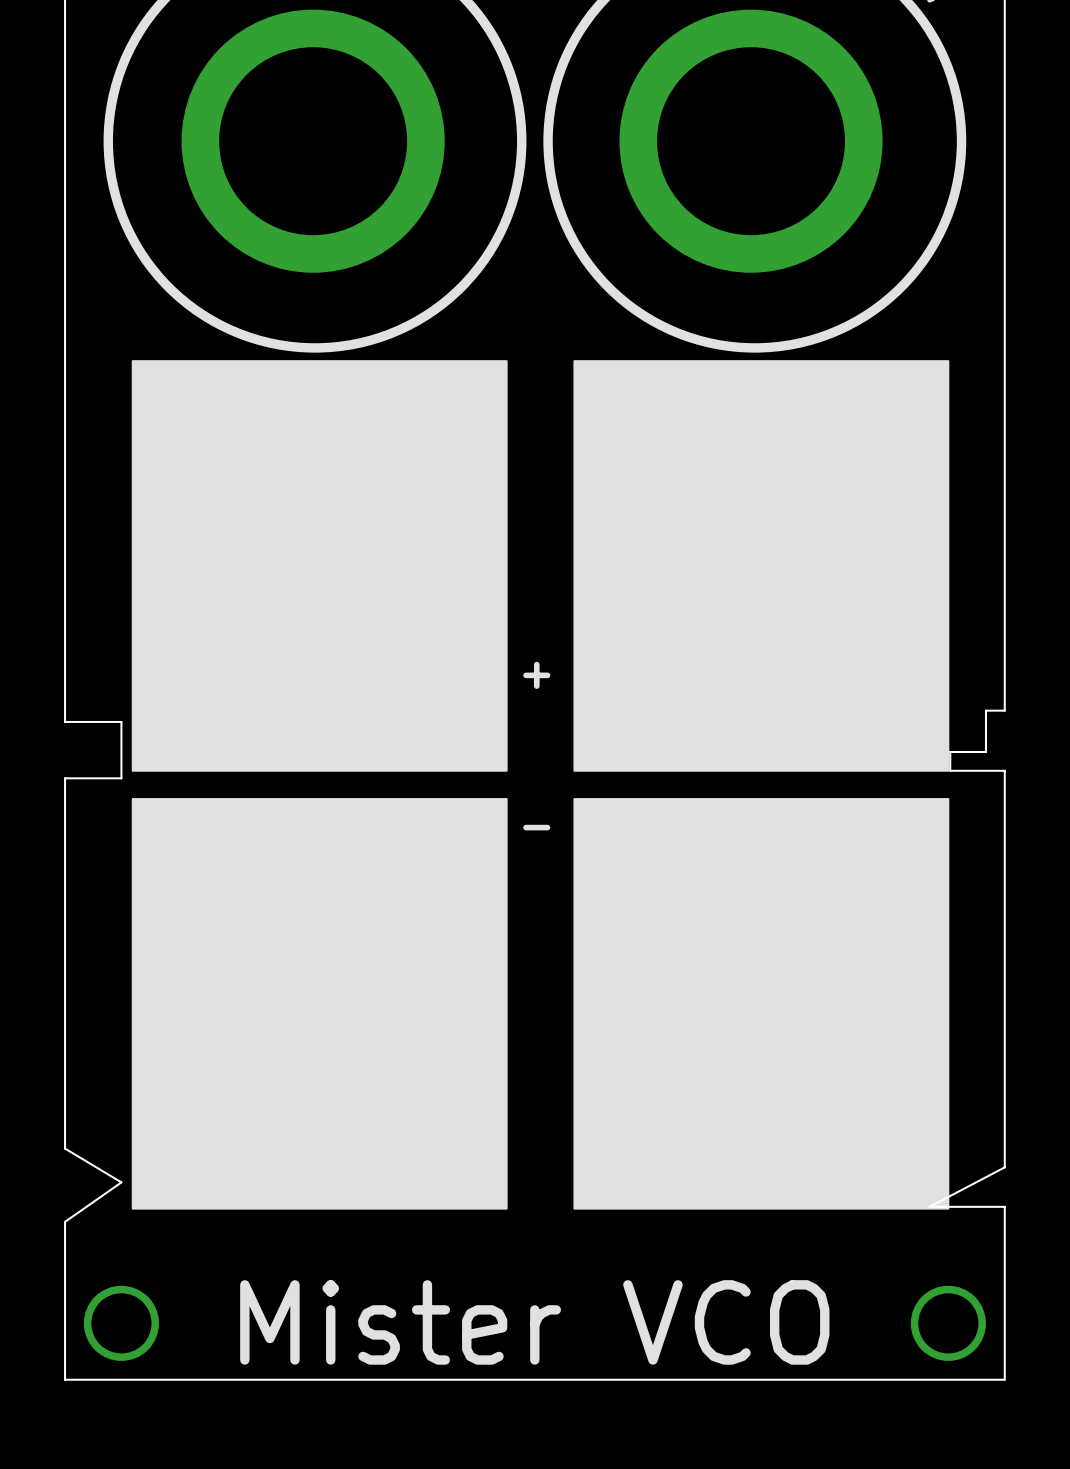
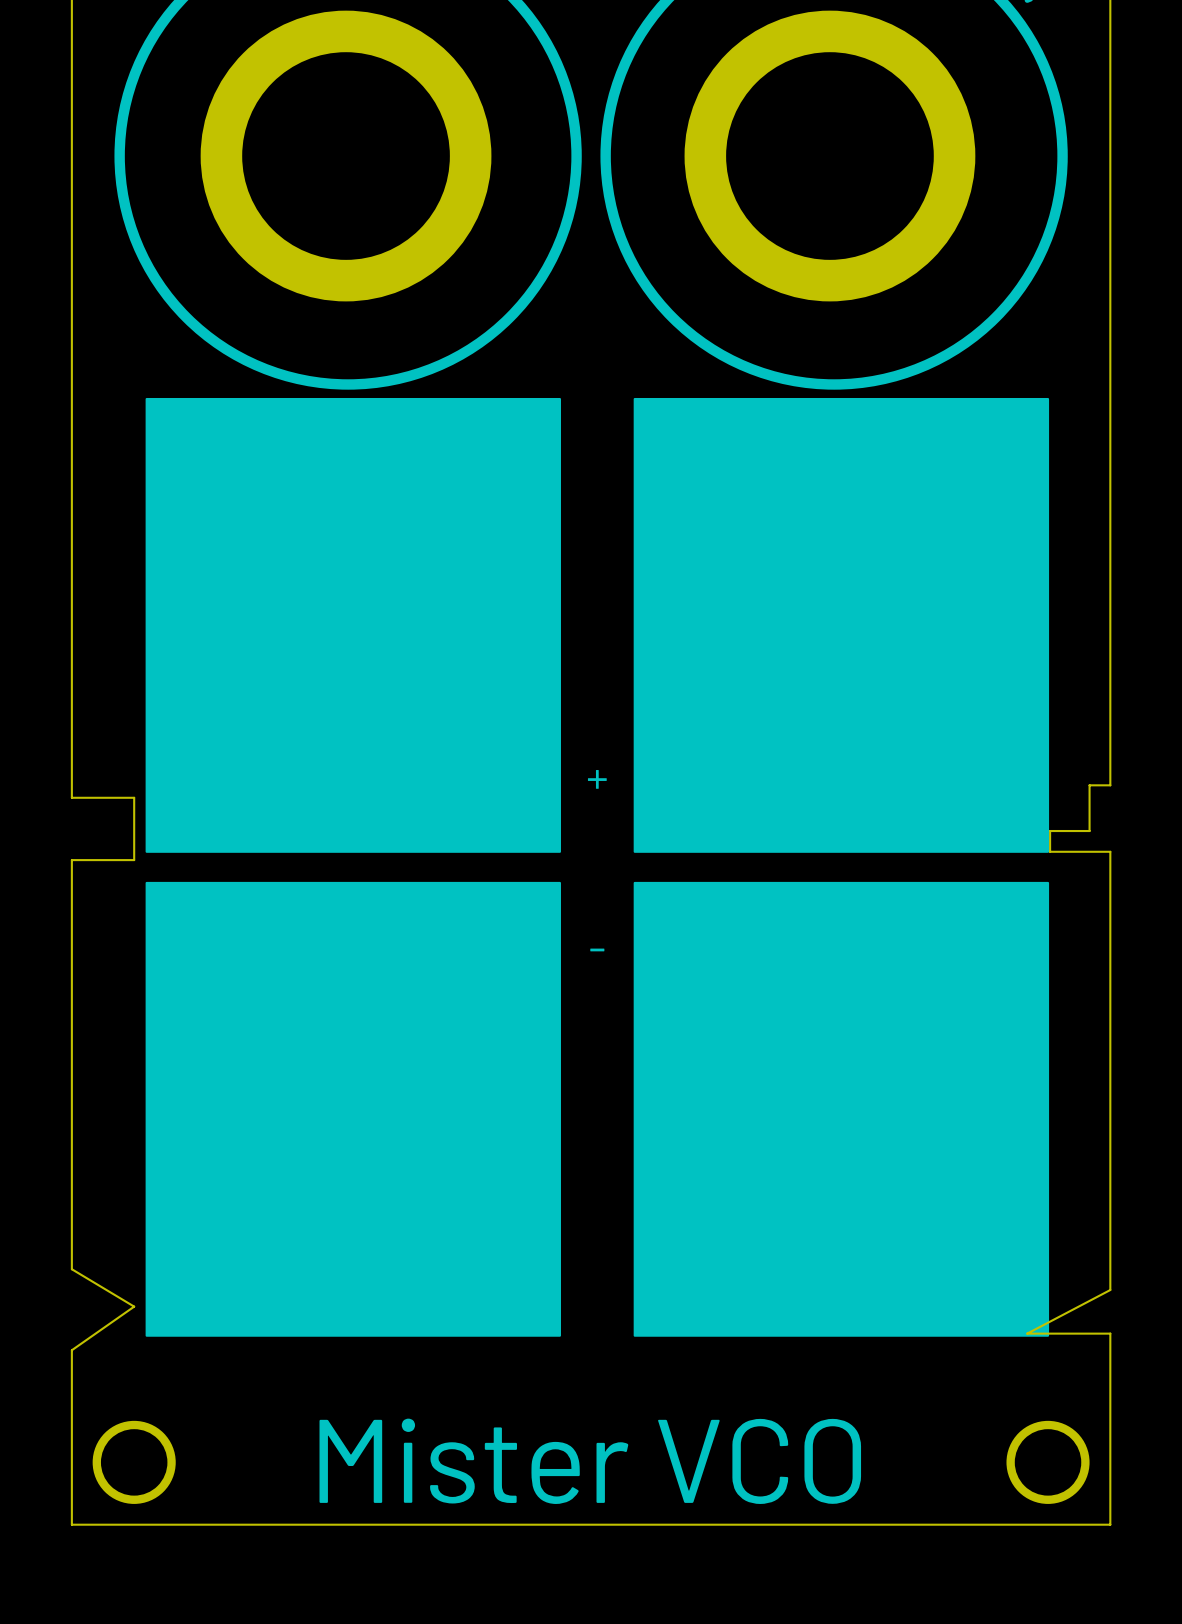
text position: + (536, 675) -> + (597, 779)
text position: - (536, 827) -> - (597, 949)

